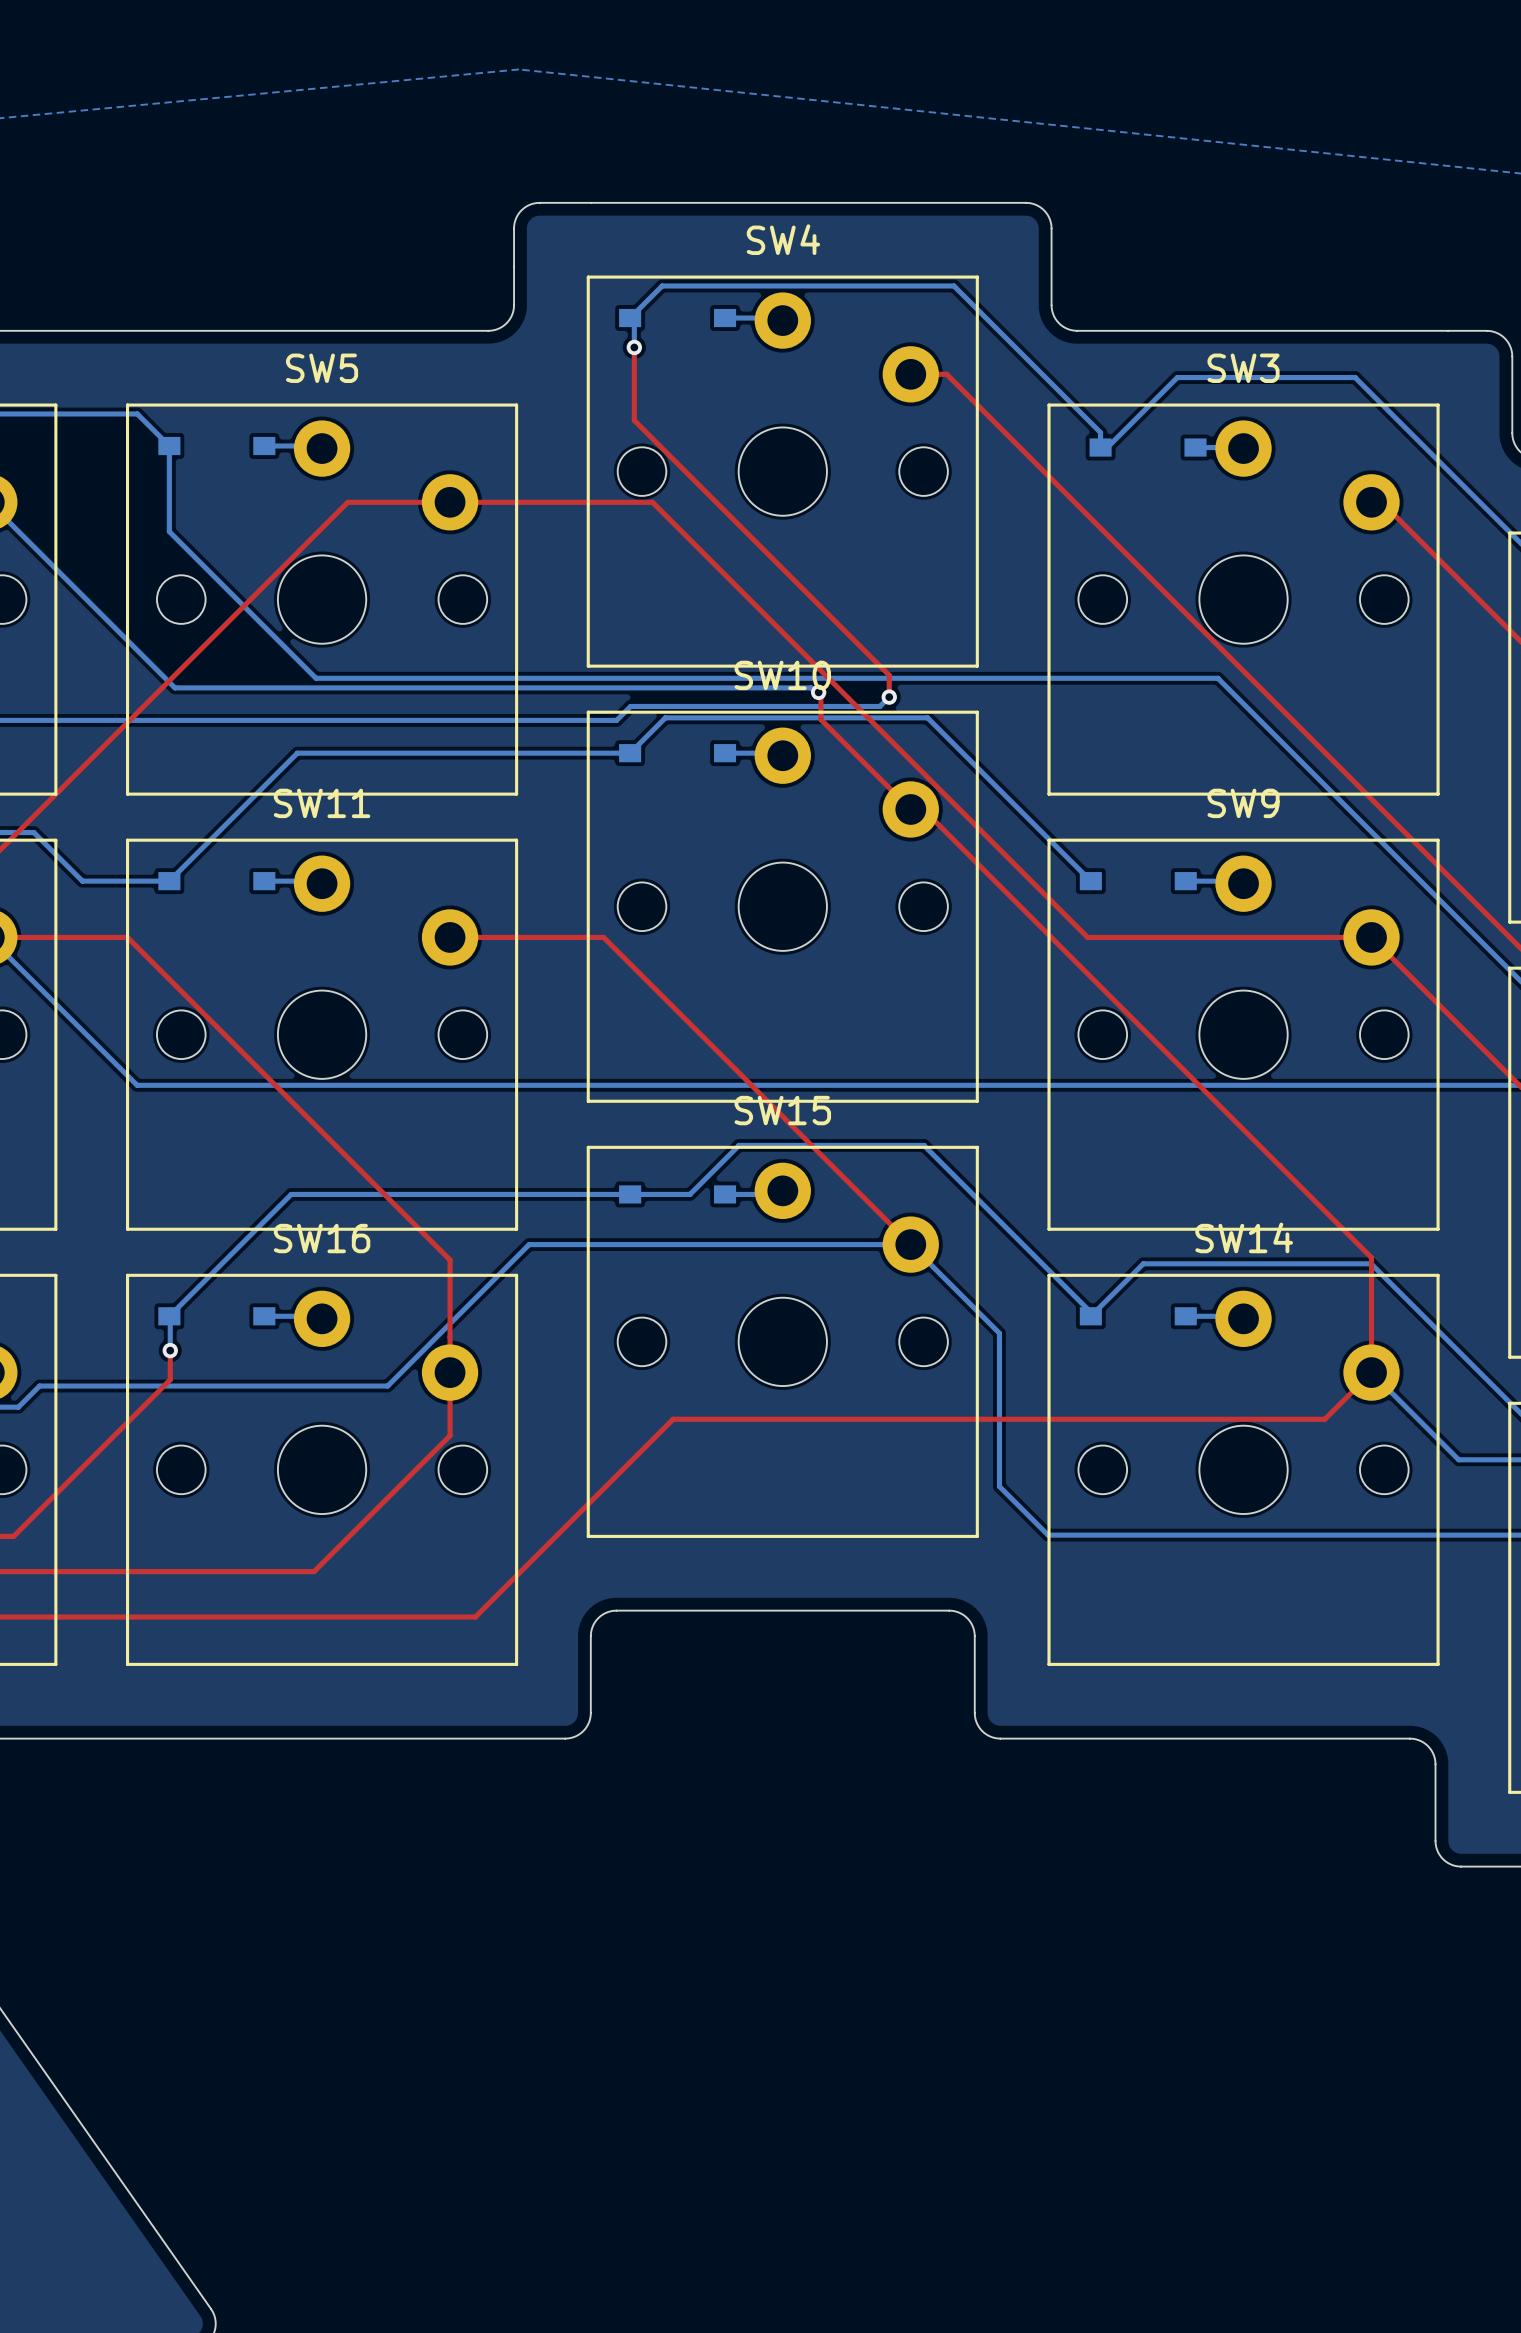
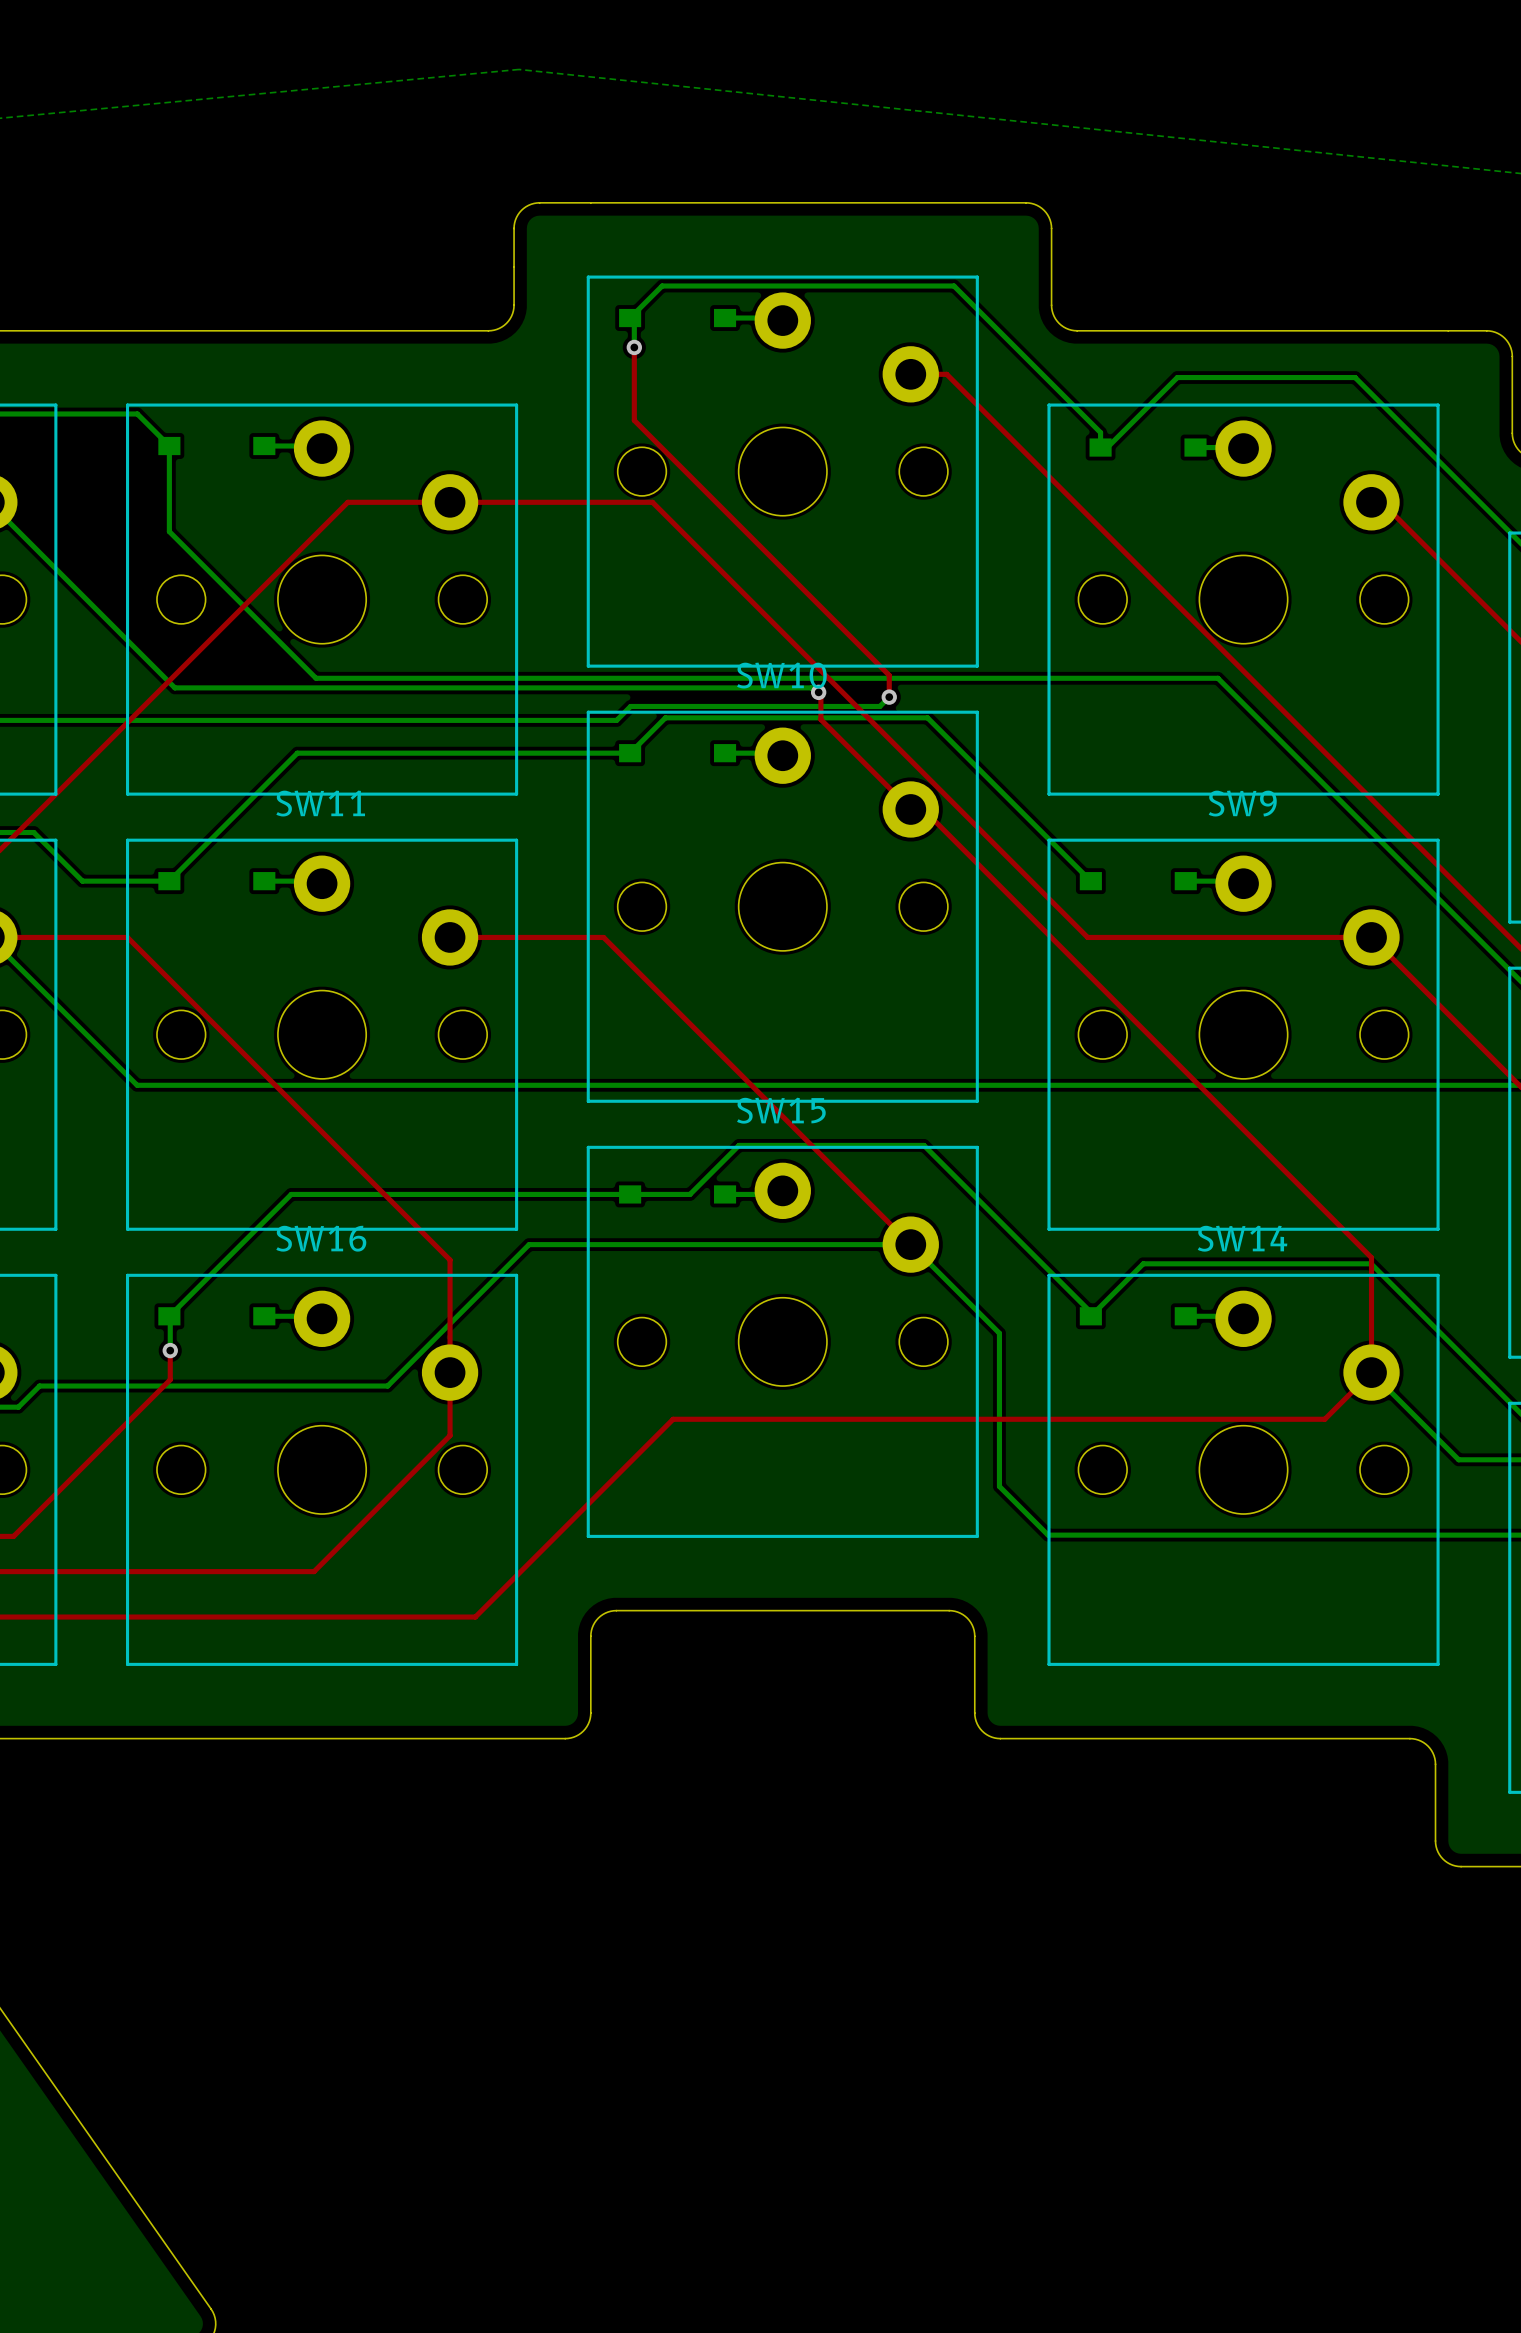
SW4 name: SW4 (783, 239) -> none
SW5 name: SW5 (322, 368) -> none
SW3 name: SW3 (1243, 368) -> none

